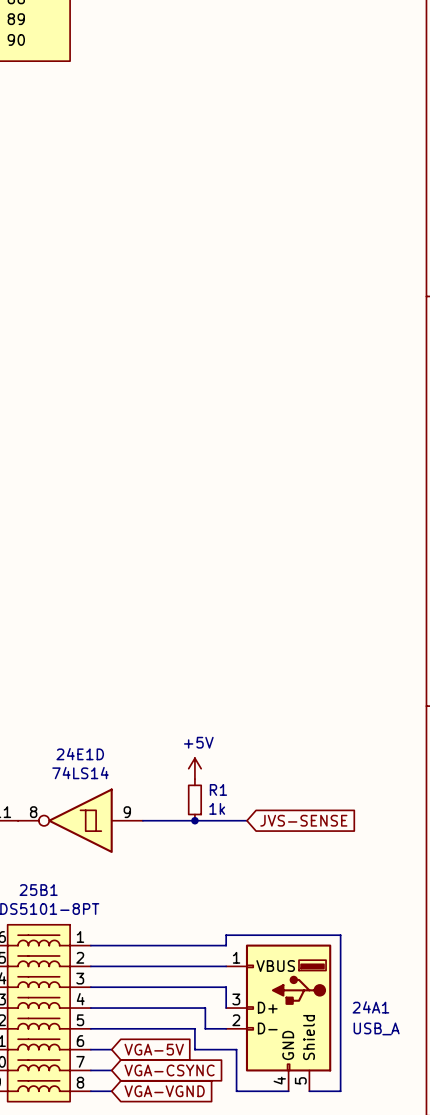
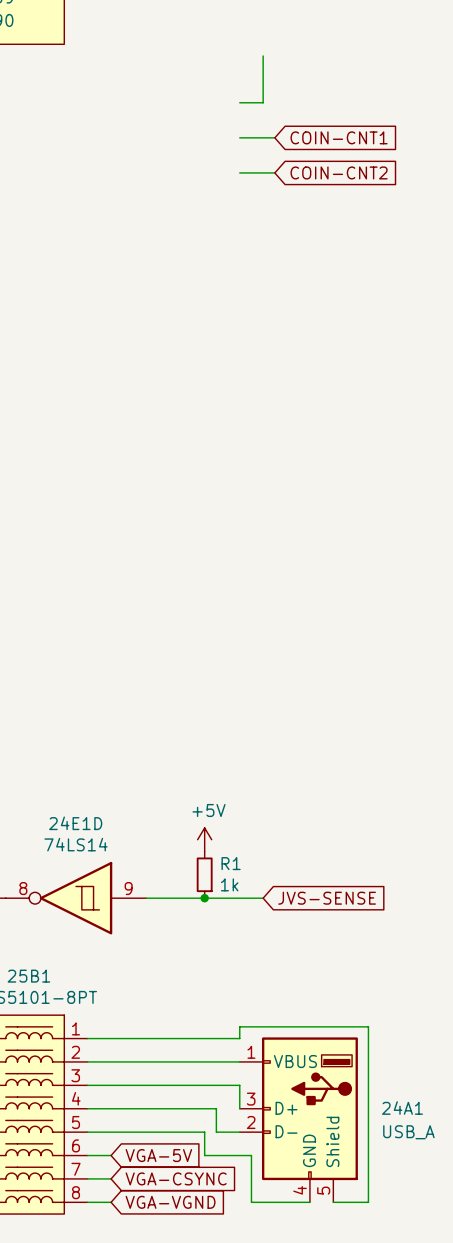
wire: none -> (263, 55) (263, 102) (239, 102)
wire: none -> (239, 137) (274, 137)
global label: none -> COIN-CNT1 (339, 137)
wire: none -> (239, 172) (274, 172)
global label: none -> COIN-CNT2 (339, 172)

